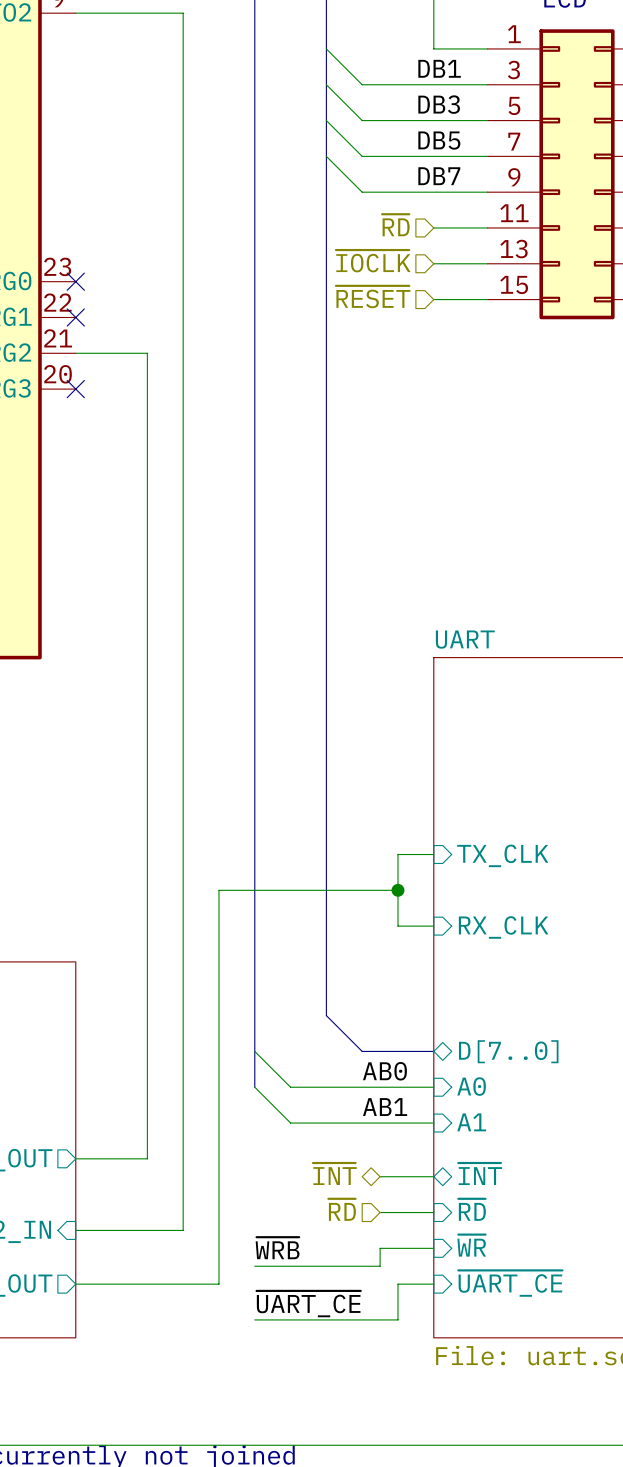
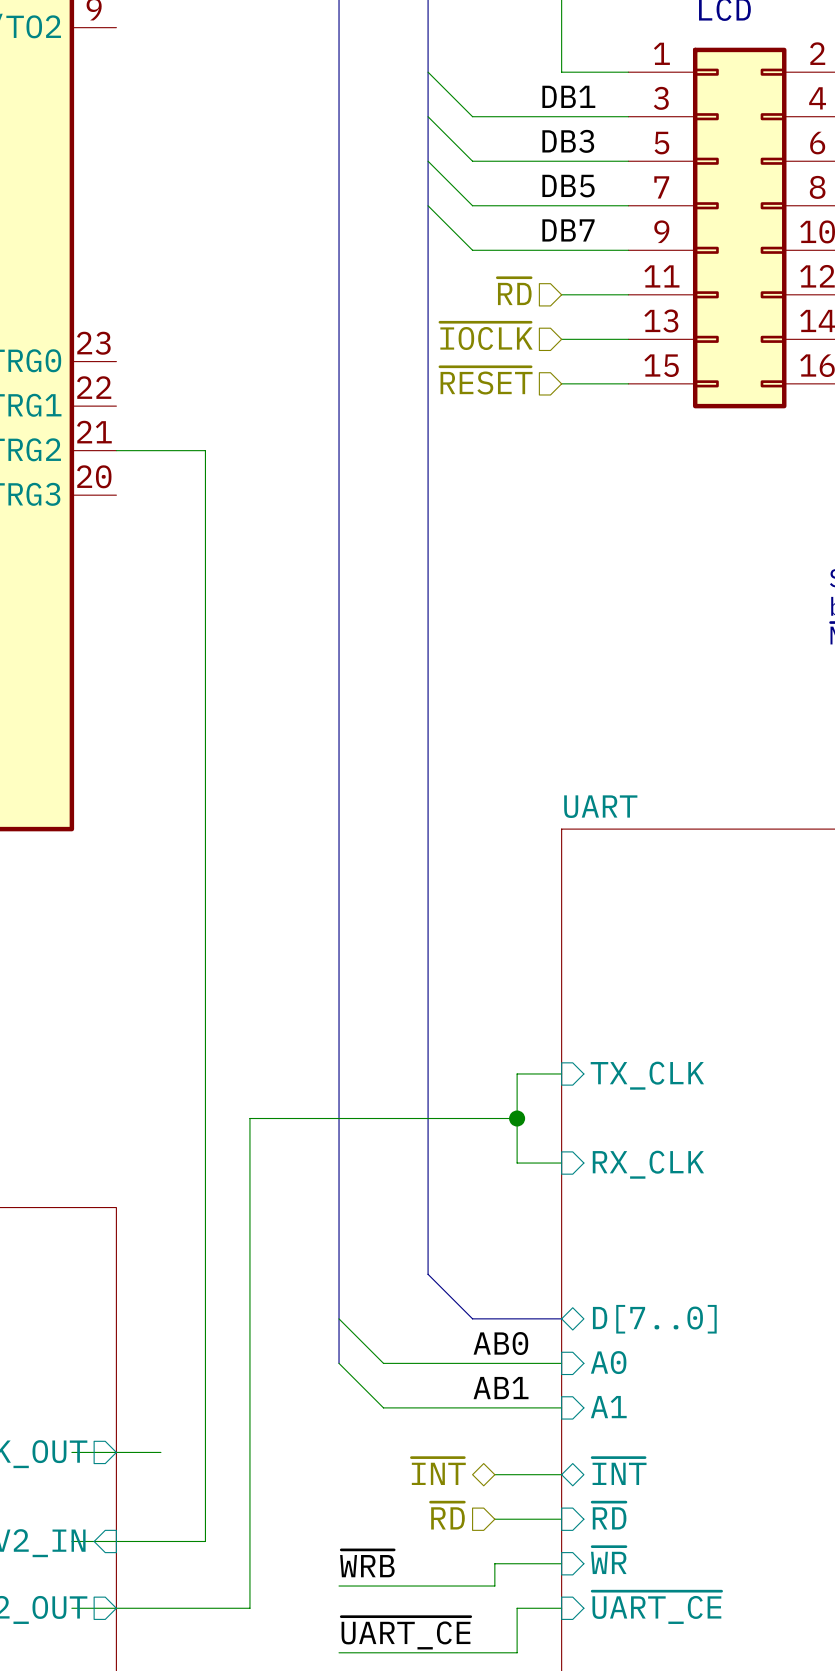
wire: (75, 13) (183, 13) (183, 890) -> none
no-connect mark: (75, 281) -> none
no-connect mark: (75, 317) -> none
no-connect mark: (75, 389) -> none
wire: (218, 890) (218, 1284) (183, 1284) -> (294, 1118) (249, 1118)
wire: none -> (71, 1452) (116, 1452)
wire: (111, 1158) (147, 1158) -> (205, 1541) (205, 1452)
wire: none -> (71, 1541) (116, 1541)
wire: (147, 1230) (183, 1230) -> (249, 1608) (249, 1541)
wire: none -> (71, 1608) (116, 1608)

